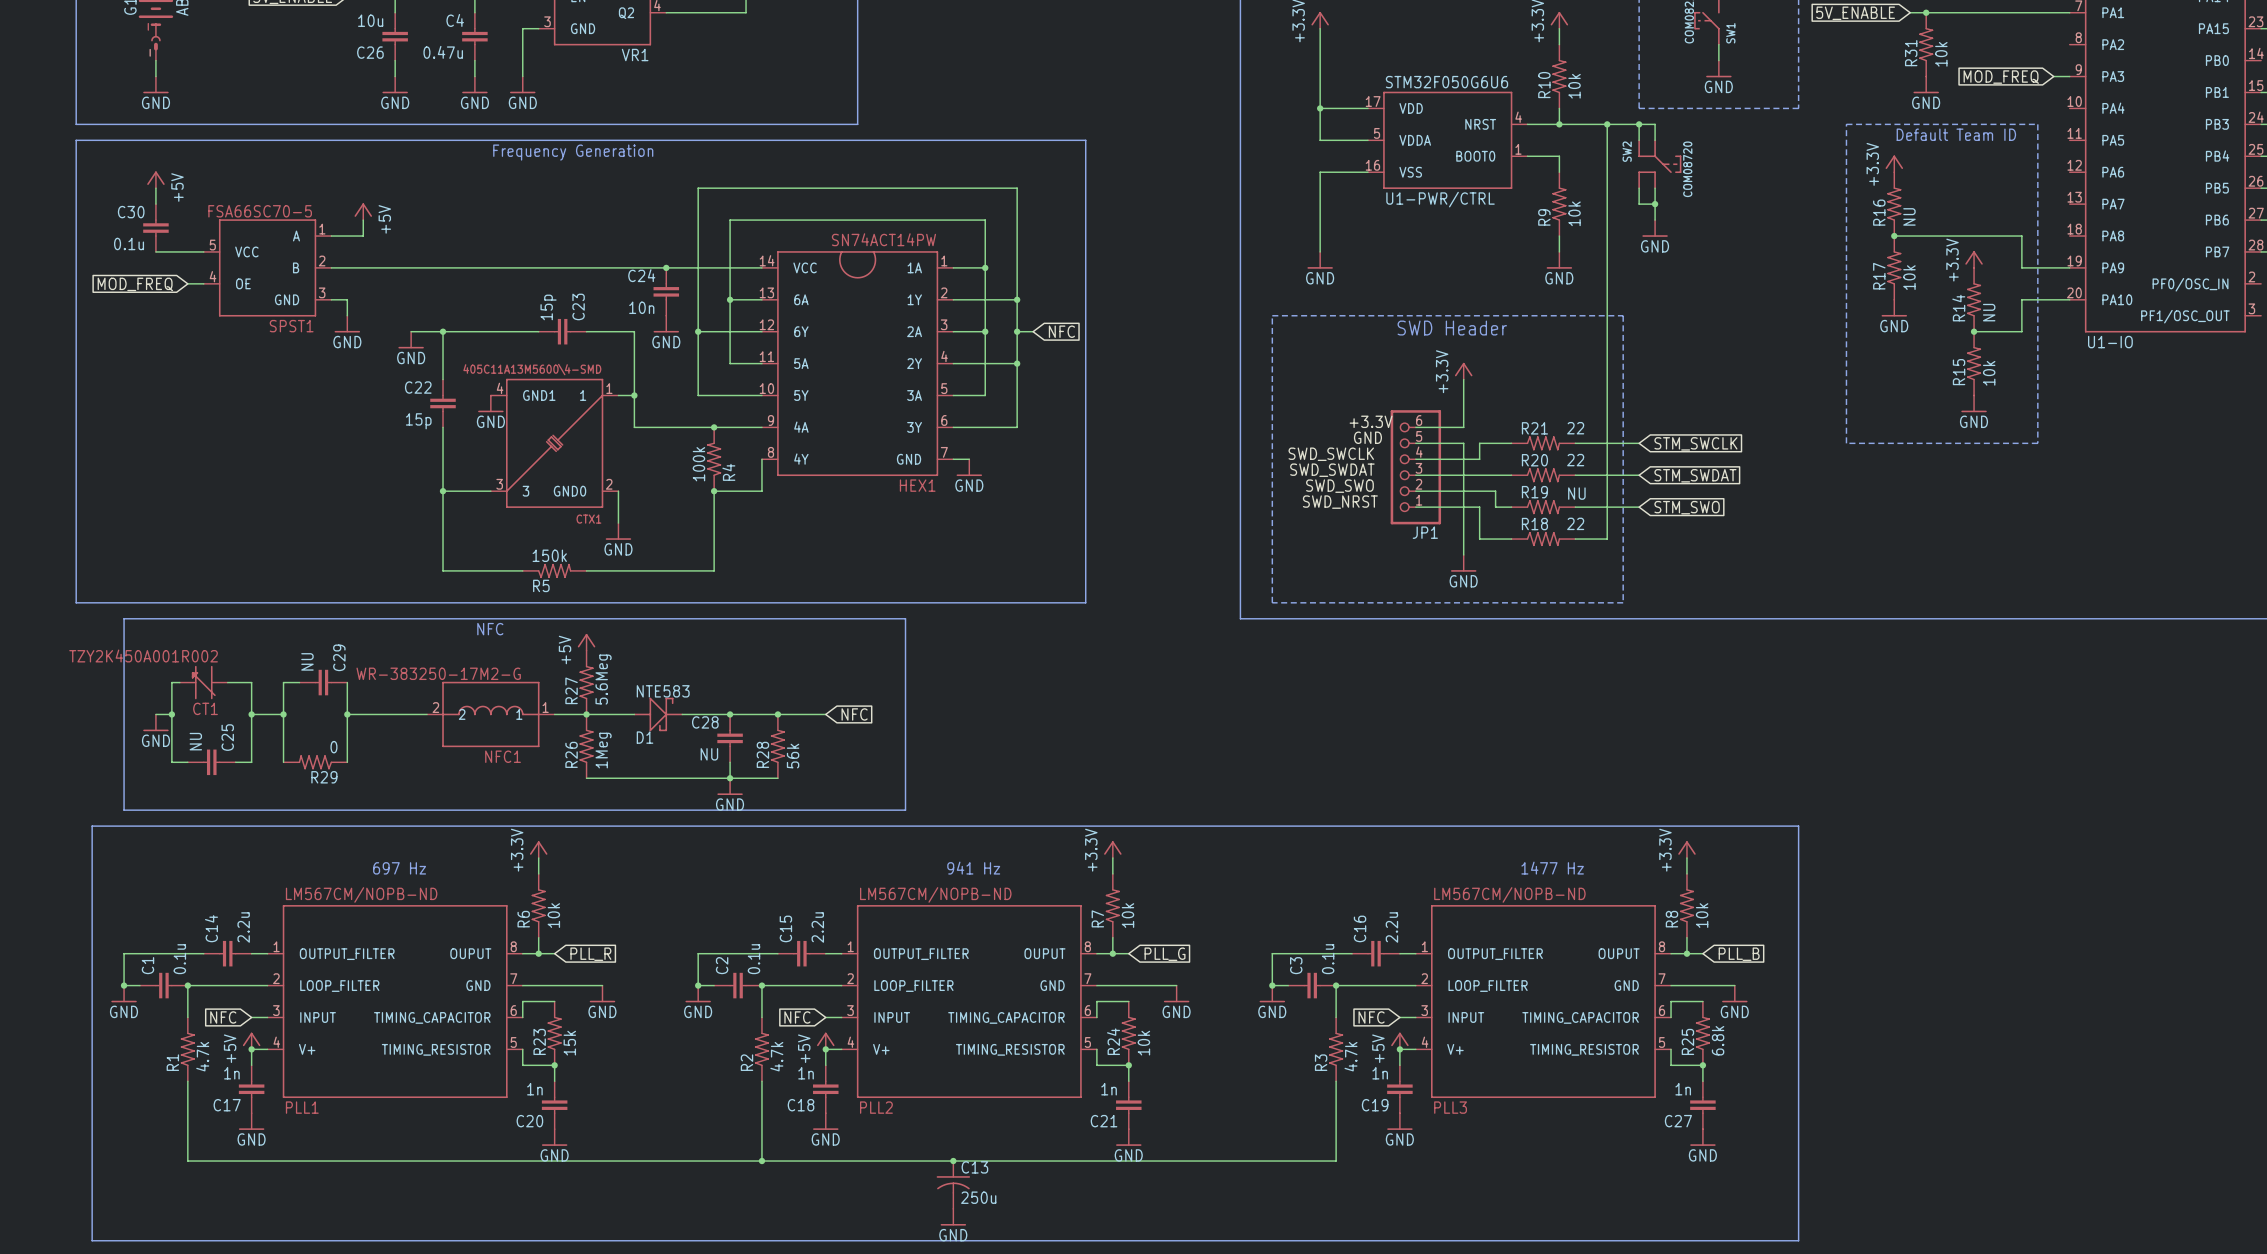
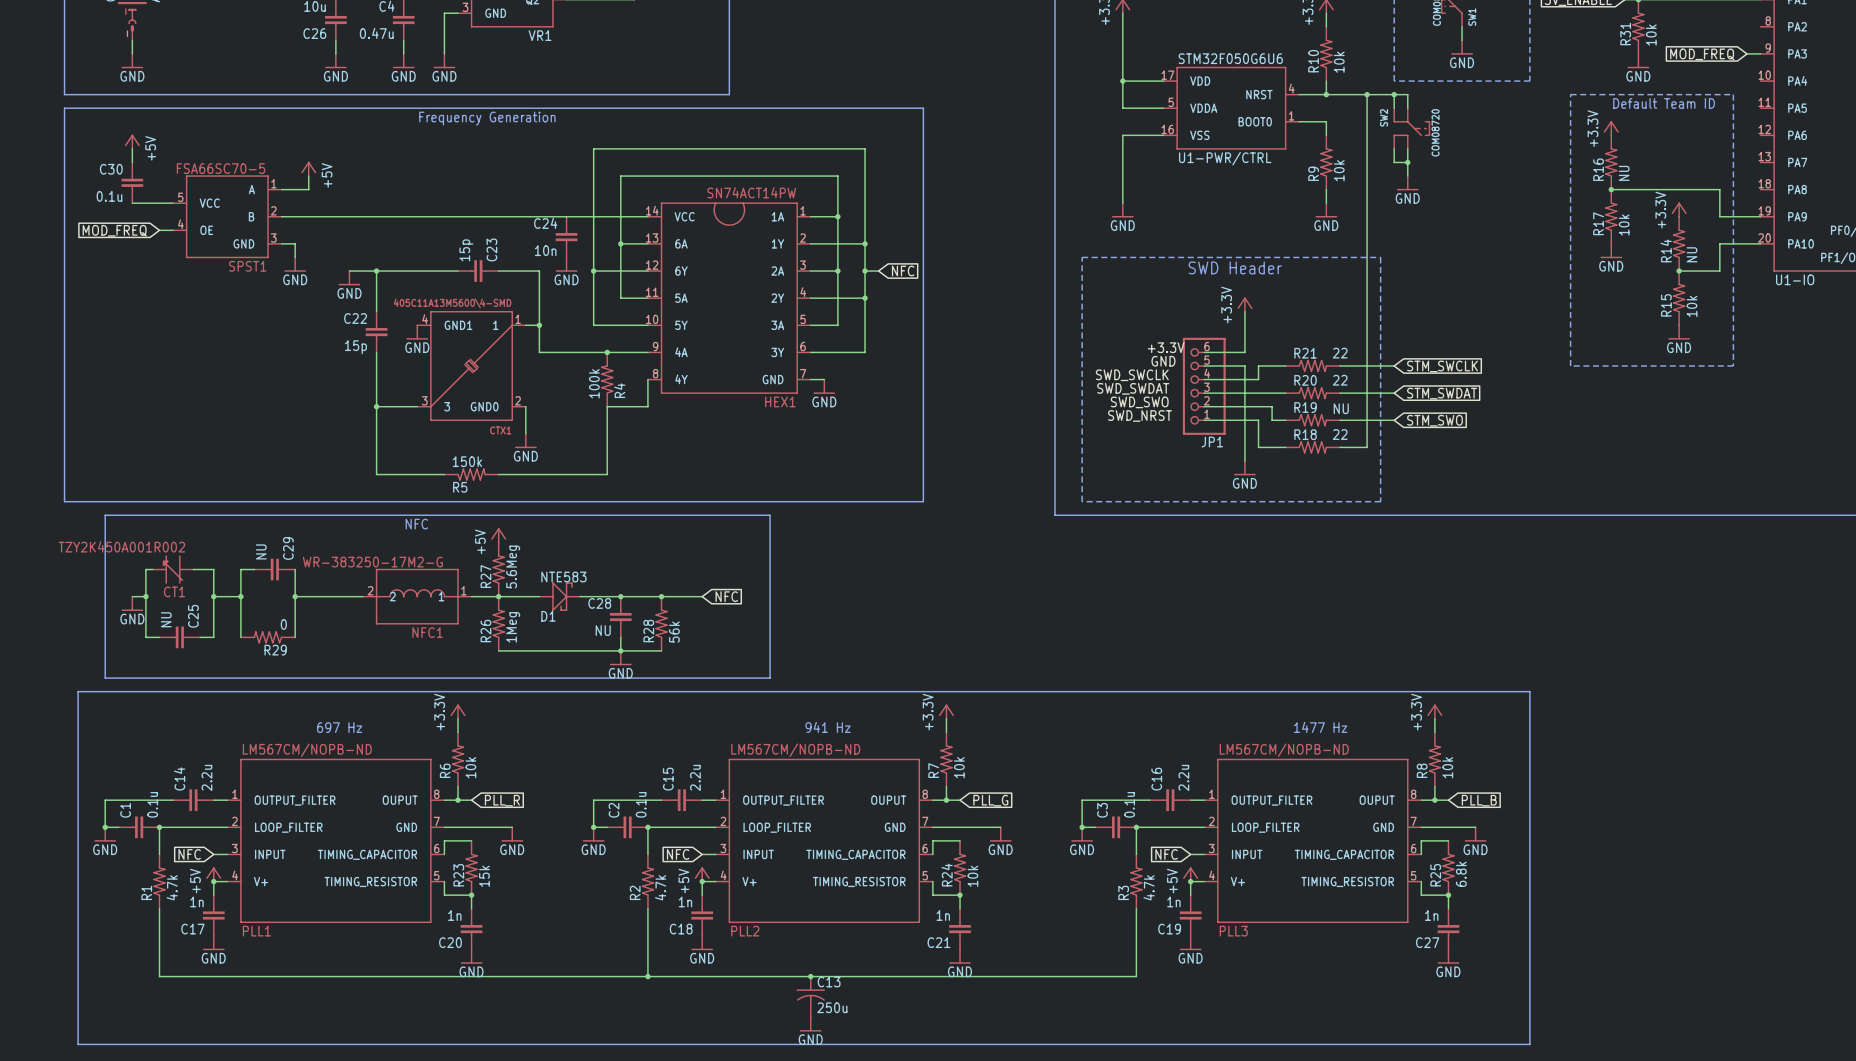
junction: (666, 267) -> none
junction: (714, 491) -> none

